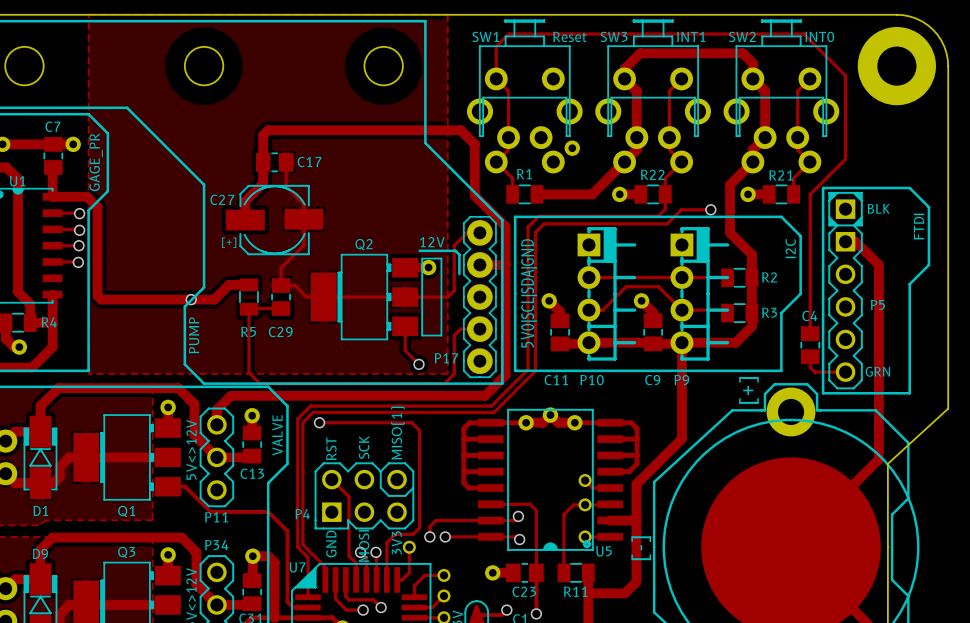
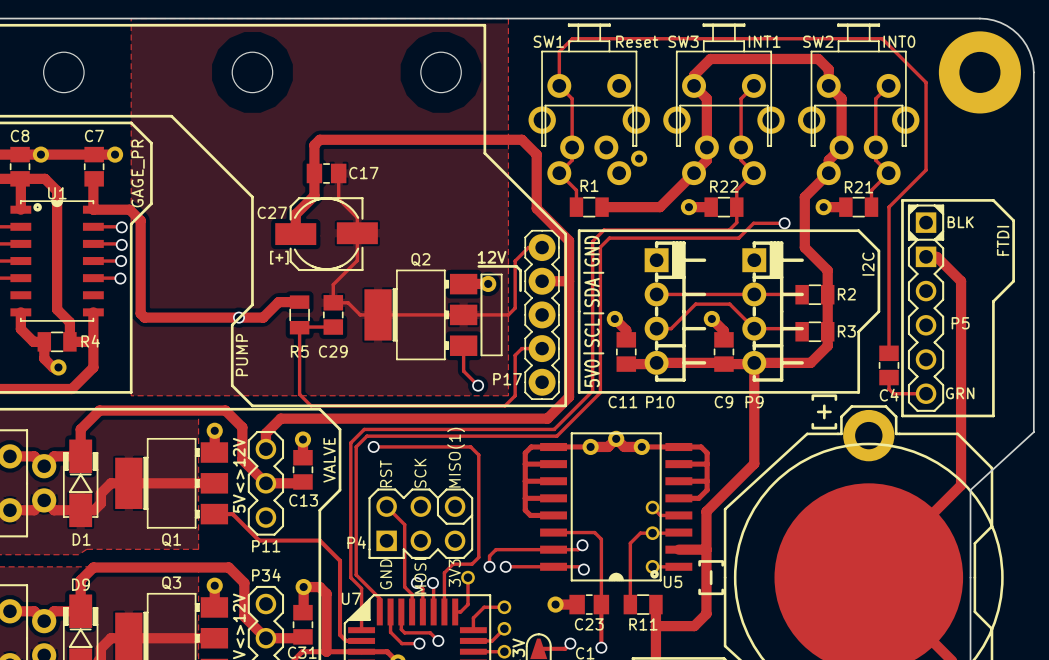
C4 name position: C4 (809, 315) -> C4 (889, 395)

